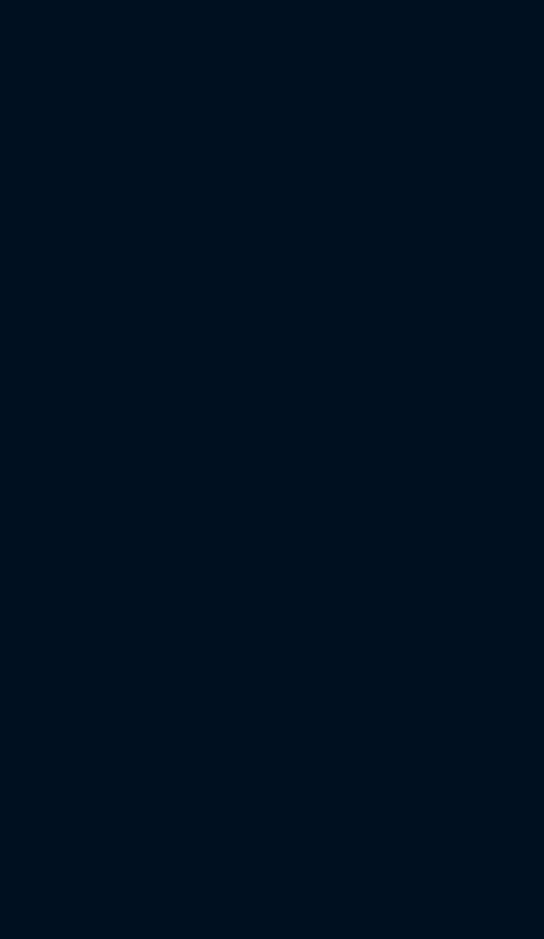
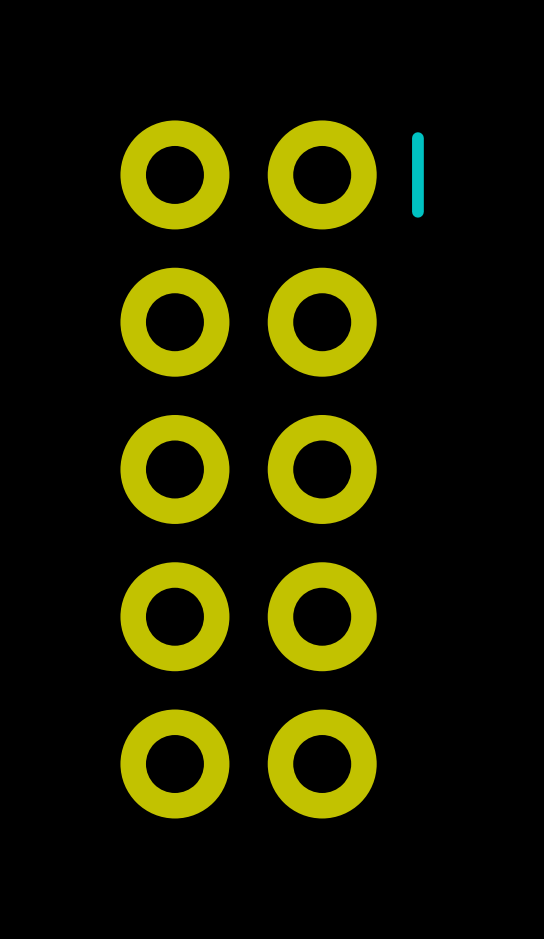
part: none -> (272, 469)

